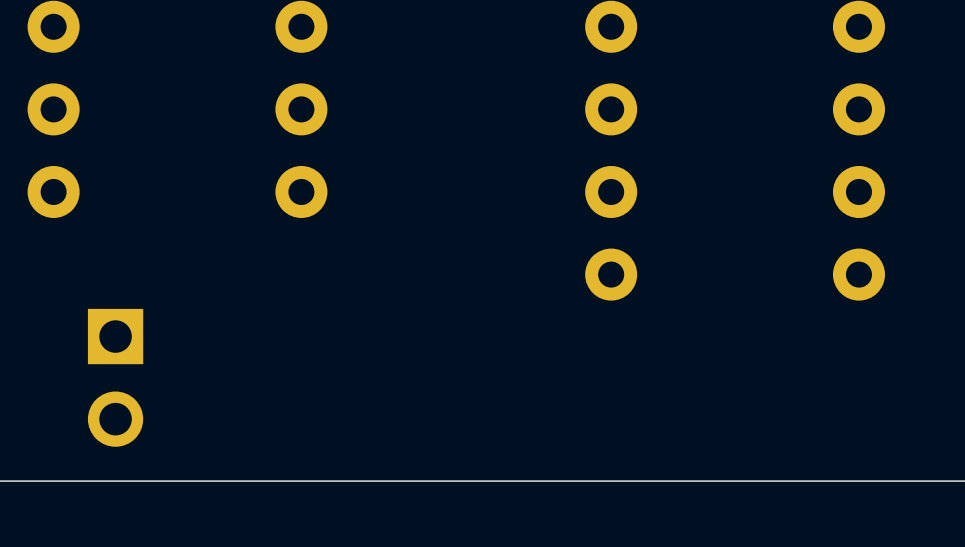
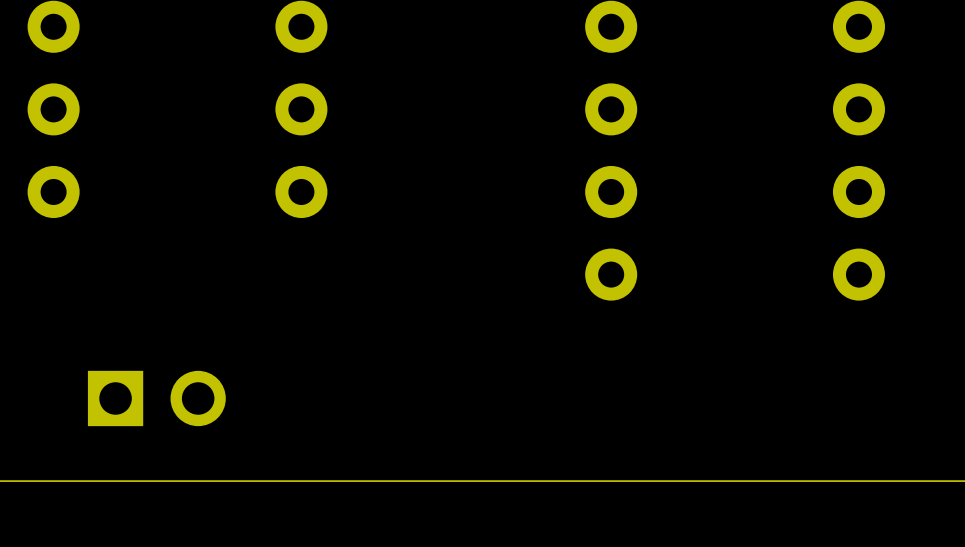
part rotation: 0° (115, 377) -> 90° counterclockwise (156, 398)

